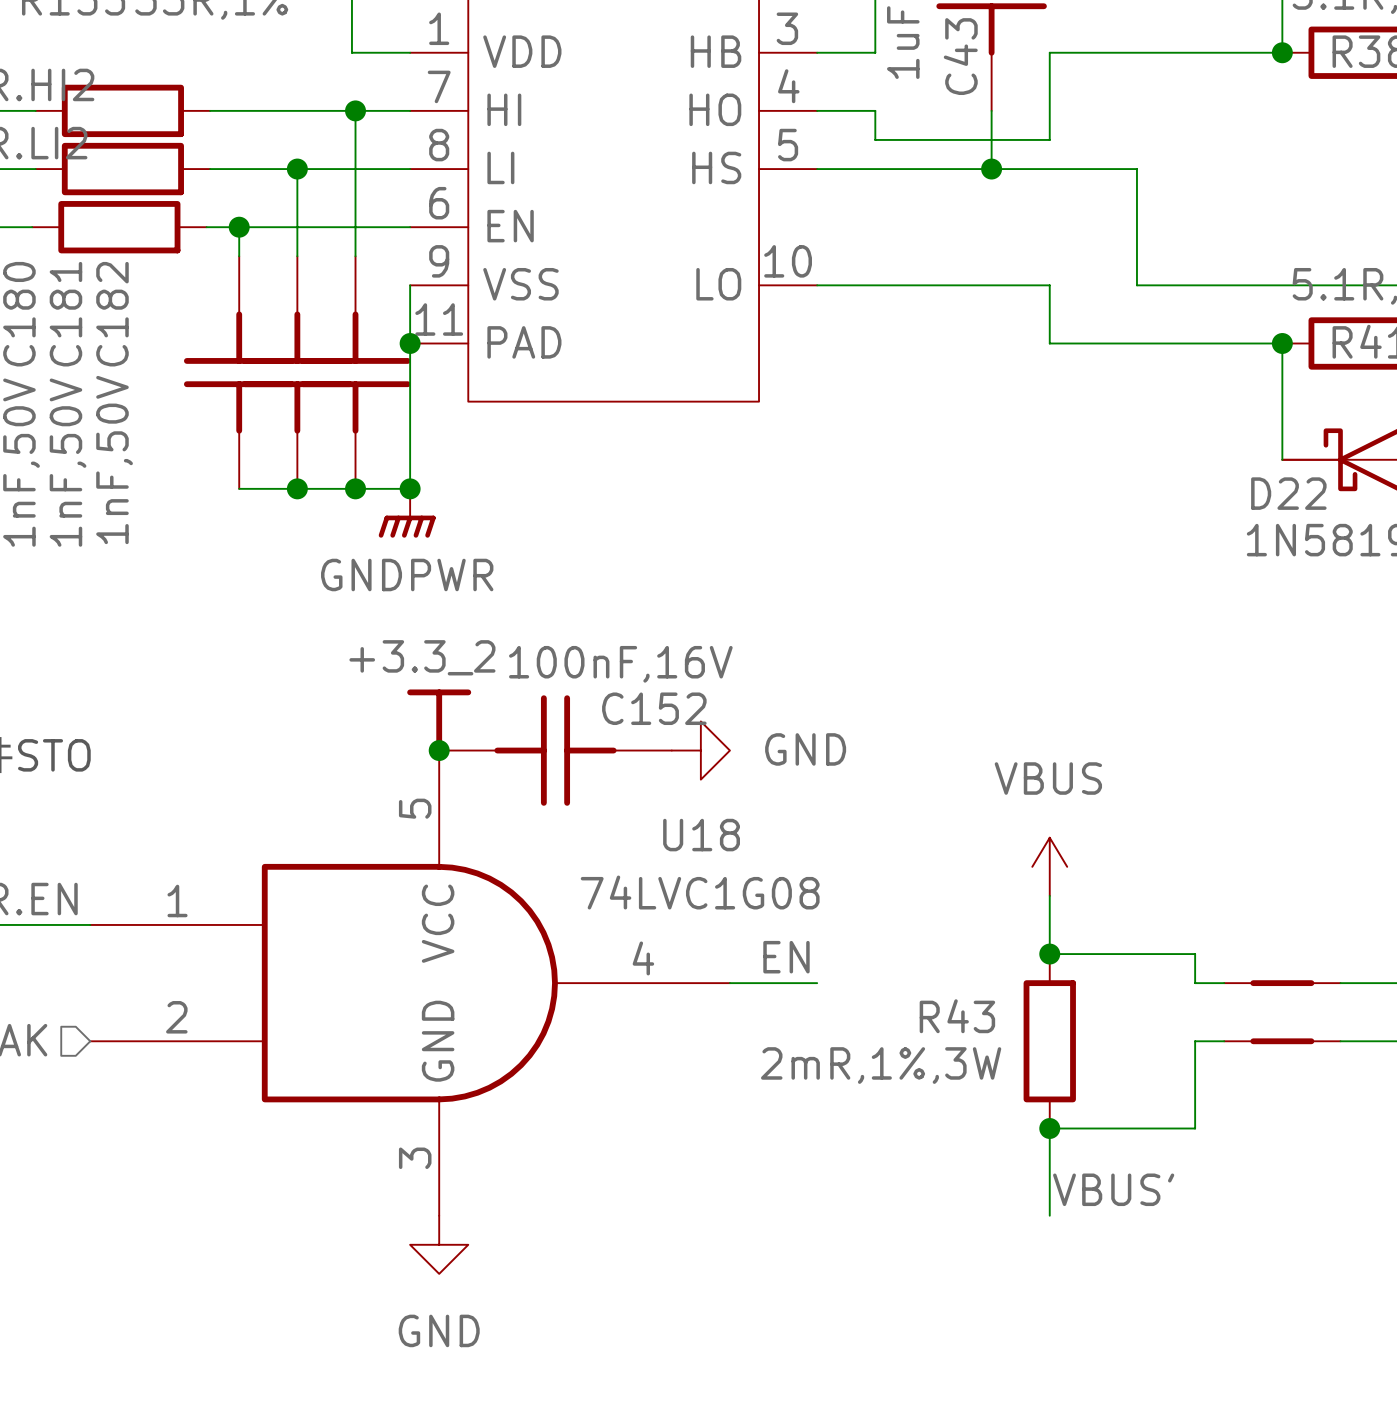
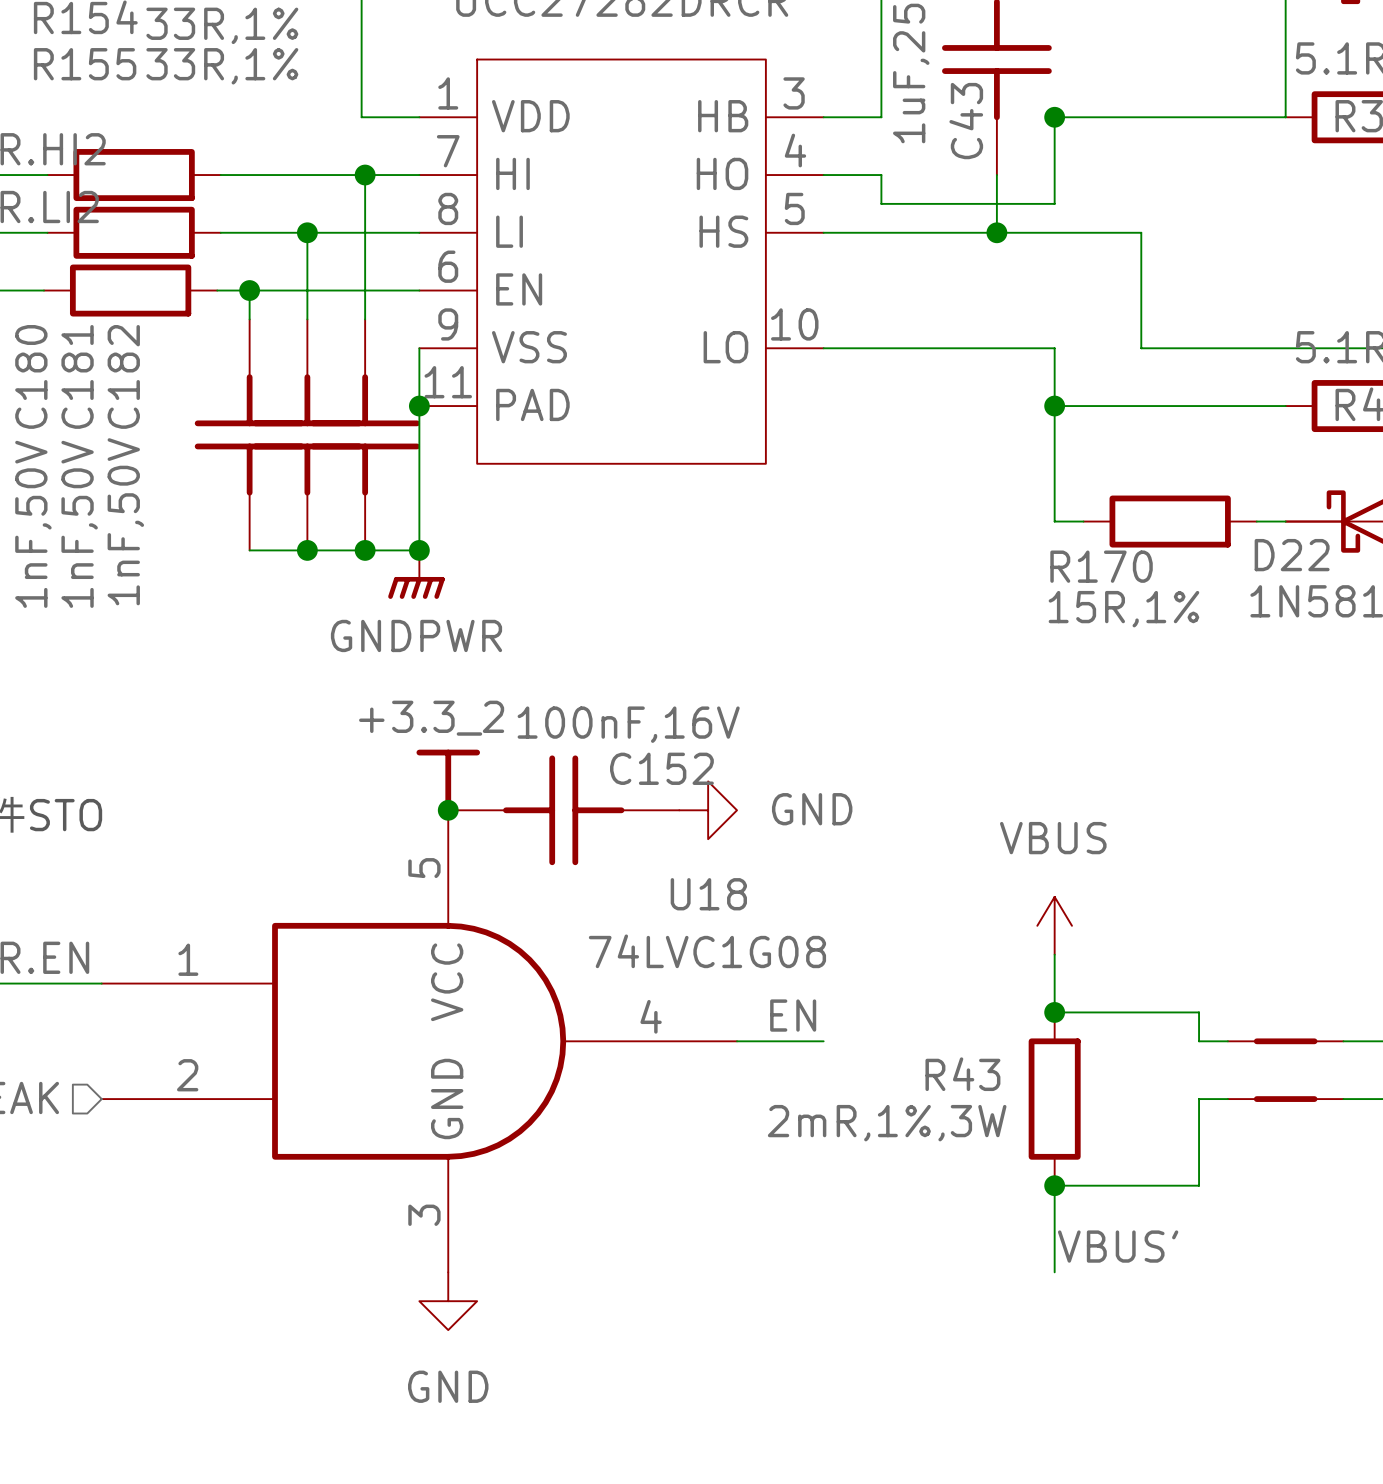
junction: none -> (1054, 117)
junction: (1282, 52) -> none
wire: none -> (1054, 406) (1054, 521) (1083, 521)
junction: none -> (1054, 406)
wire: (1282, 343) (1282, 459) -> (1256, 521) (1285, 521)
junction: (1282, 343) -> none
R170: none -> 15R,1% (1170, 521)

